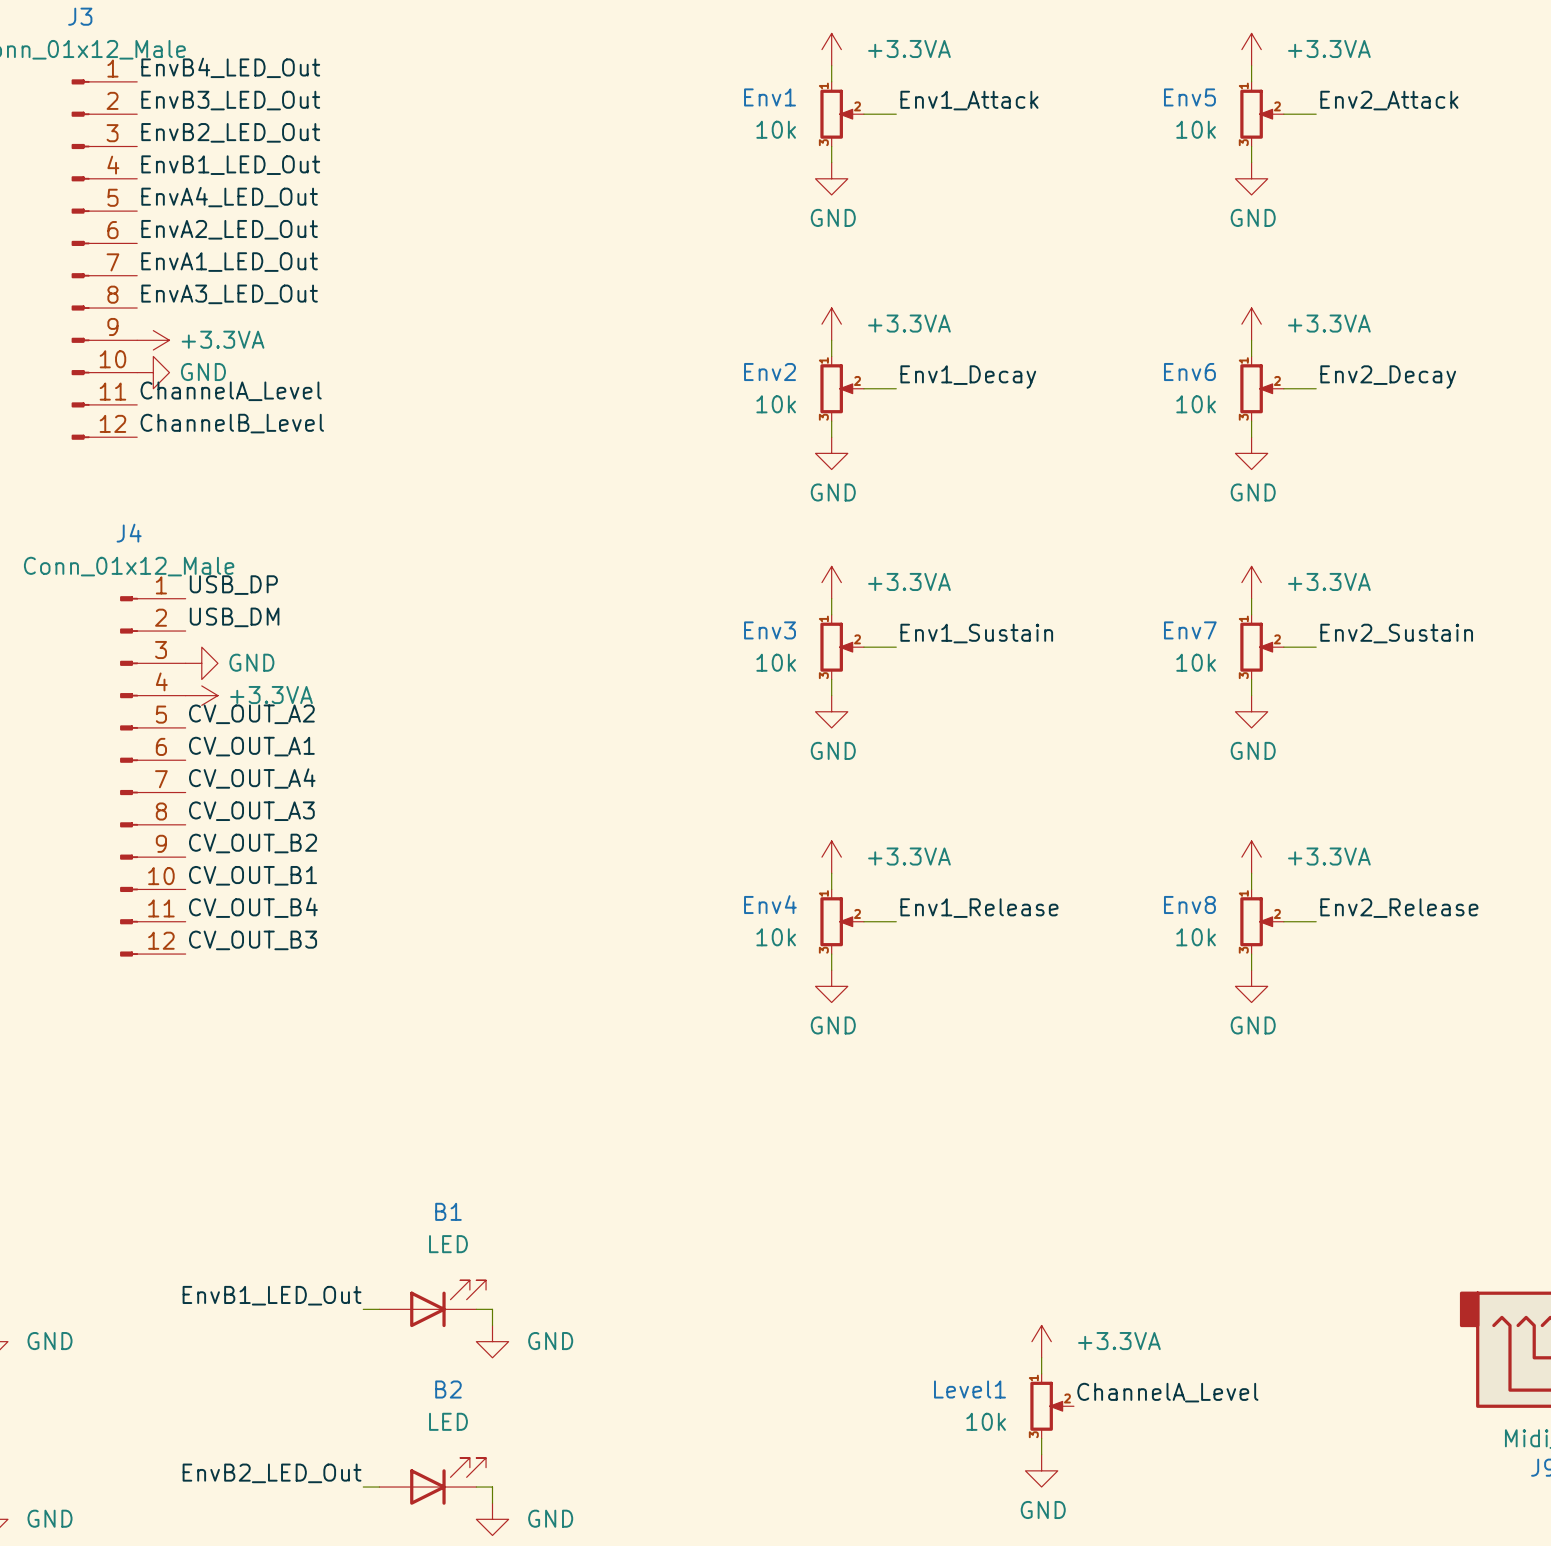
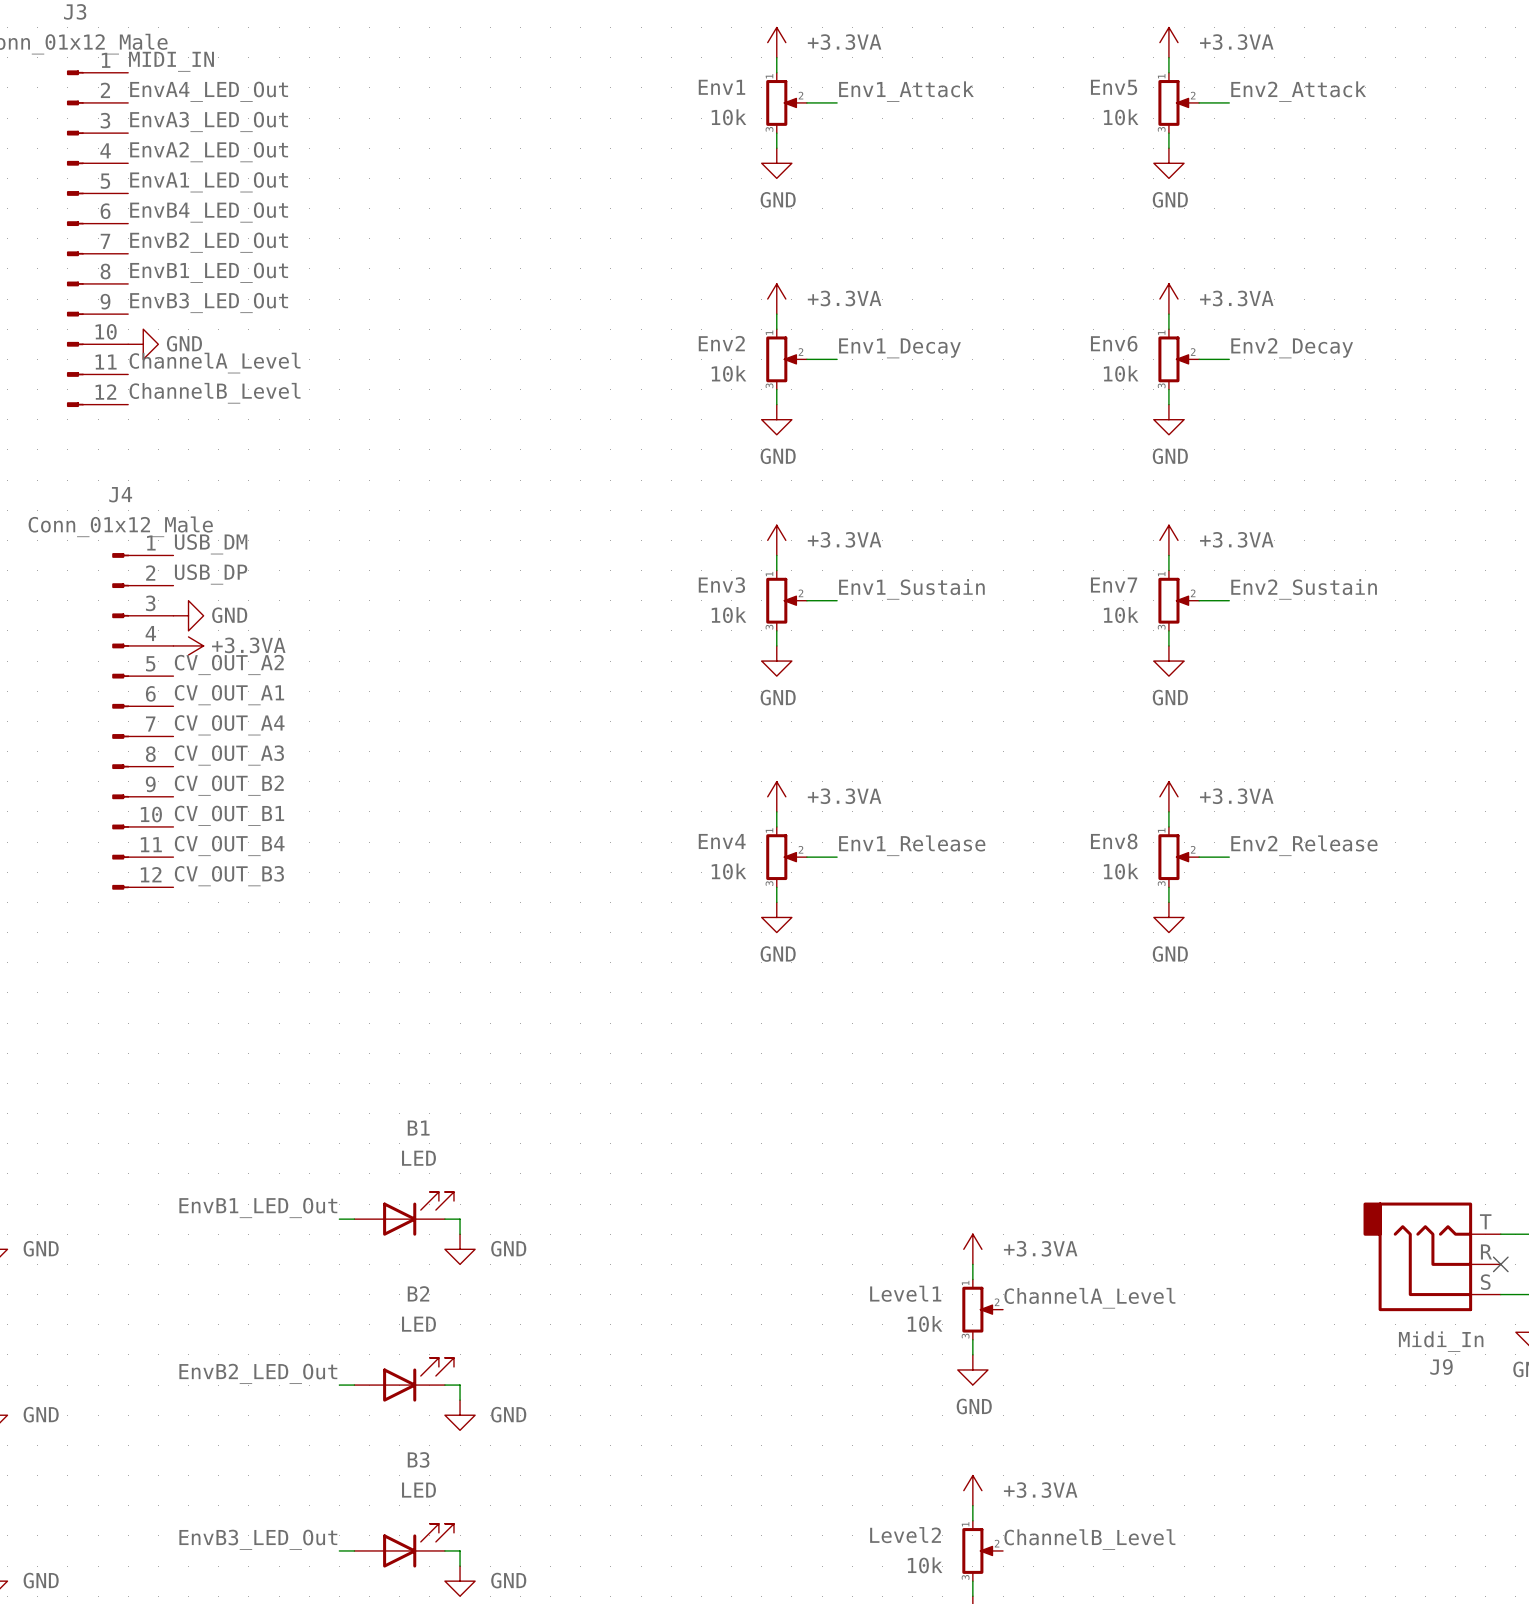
label: EnvB4_LED_Out (230, 67) -> MIDI_IN (171, 61)
label: EnvB3_LED_Out (230, 100) -> EnvA4_LED_Out (209, 91)
label: EnvB2_LED_Out (230, 132) -> EnvA3_LED_Out (209, 121)
label: EnvB1_LED_Out (230, 165) -> EnvA2_LED_Out (209, 152)
label: EnvA4_LED_Out (229, 197) -> EnvA1_LED_Out (209, 182)
label: EnvA2_LED_Out (229, 229) -> EnvB4_LED_Out (209, 212)
label: EnvA1_LED_Out (229, 262) -> EnvB2_LED_Out (209, 242)
label: EnvA3_LED_Out (229, 294) -> EnvB1_LED_Out (209, 272)
label: none -> EnvB3_LED_Out (209, 302)
power symbol: +3.3VA (153, 340) -> none
label: USB_DP (233, 585) -> USB_DM (211, 544)
label: USB_DM (234, 617) -> USB_DP (211, 574)

